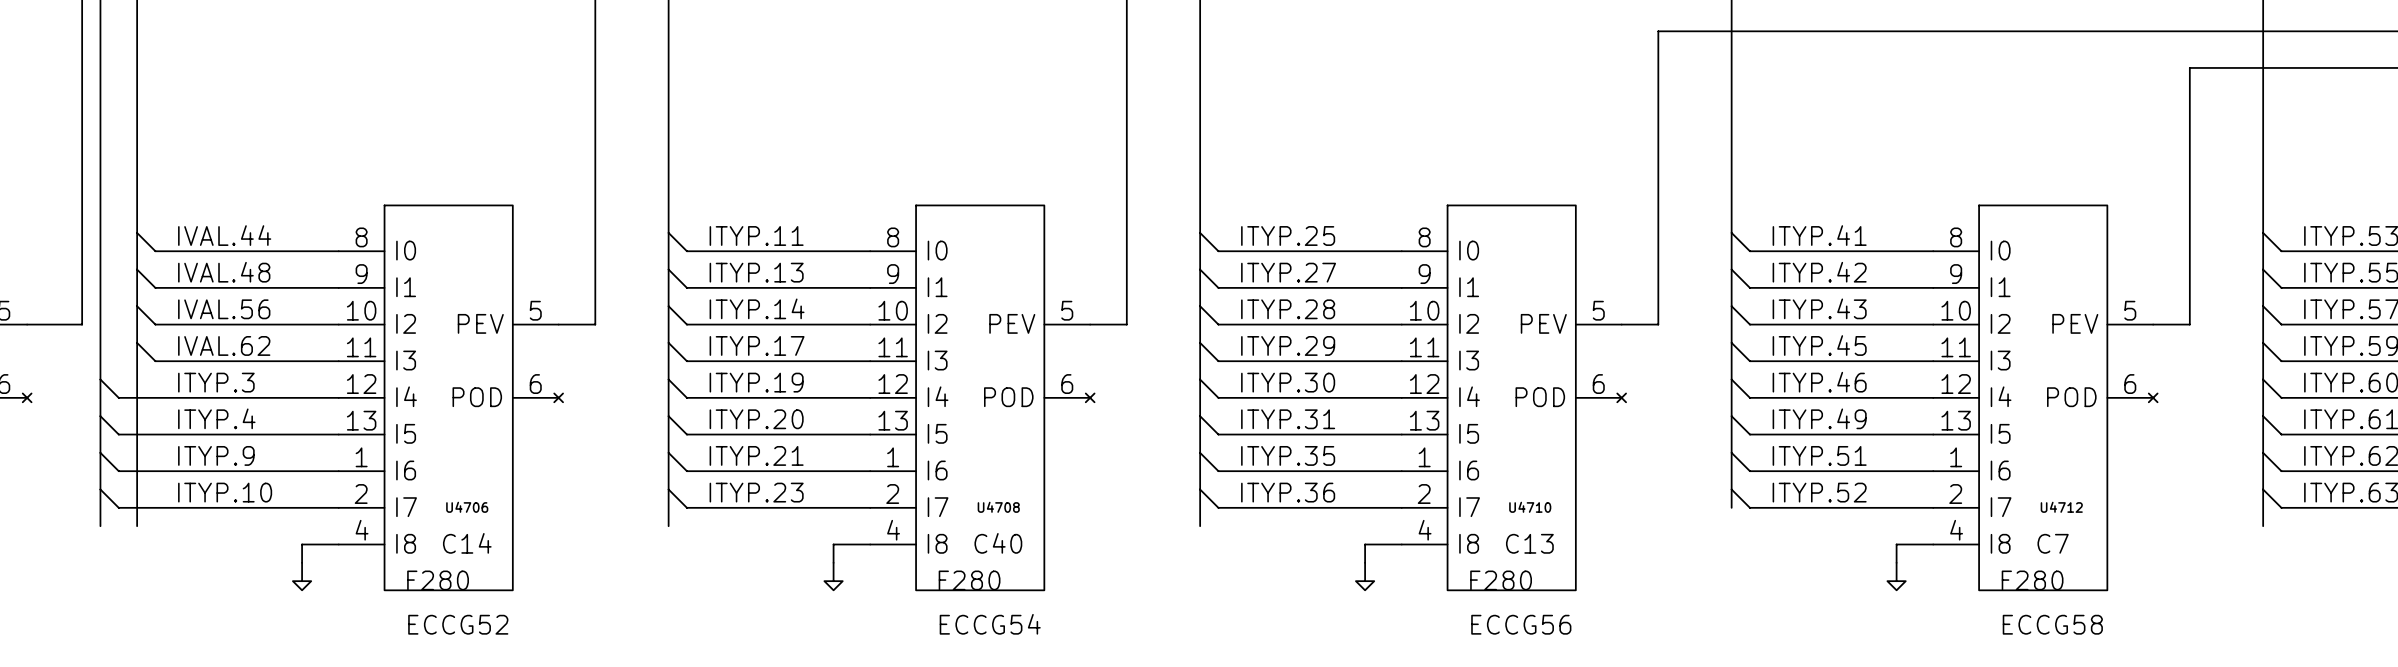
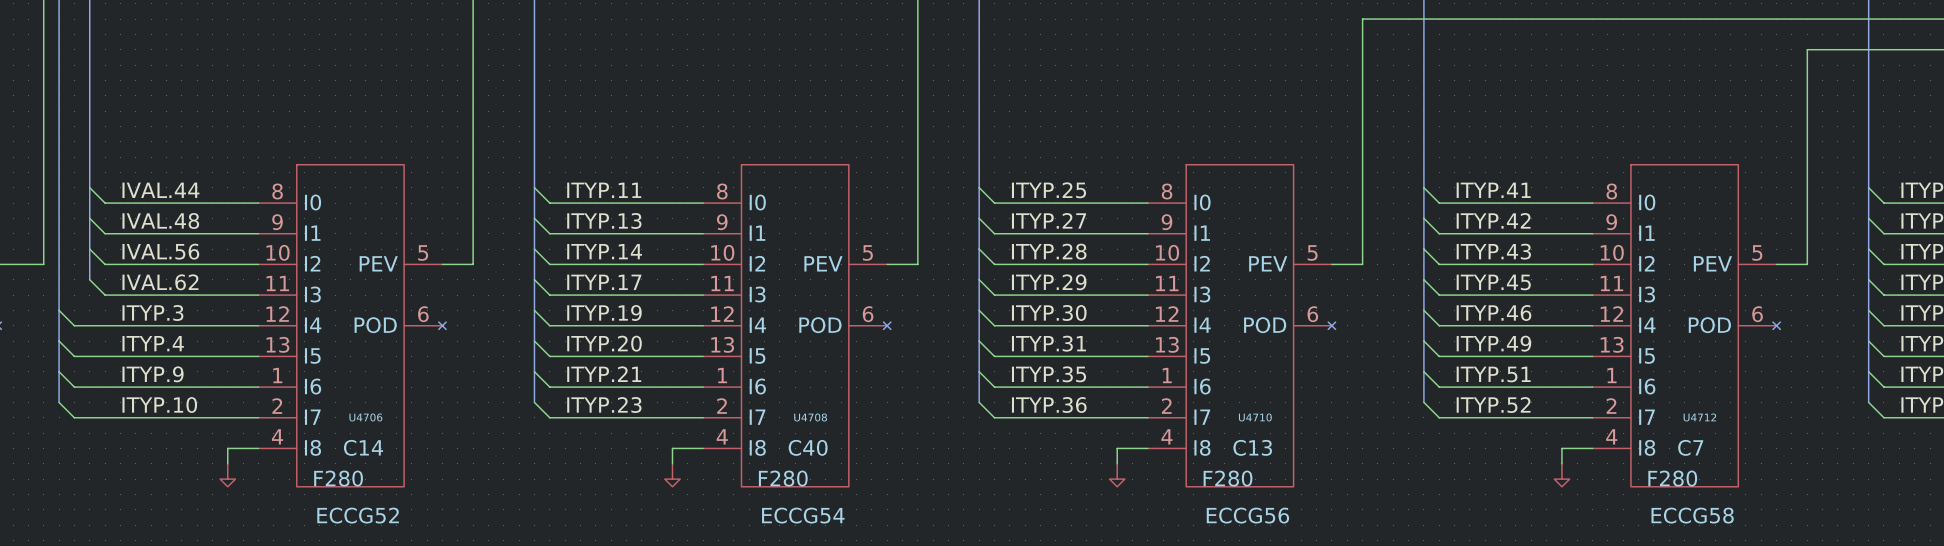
bus: (137, 342) (137, 526) -> none
bus: (100, 489) (100, 526) -> none
bus: (668, 489) (668, 526) -> none
bus: (1200, 489) (1200, 526) -> none
bus: (1731, 489) (1731, 507) -> none
bus: (2263, 489) (2263, 526) -> none

